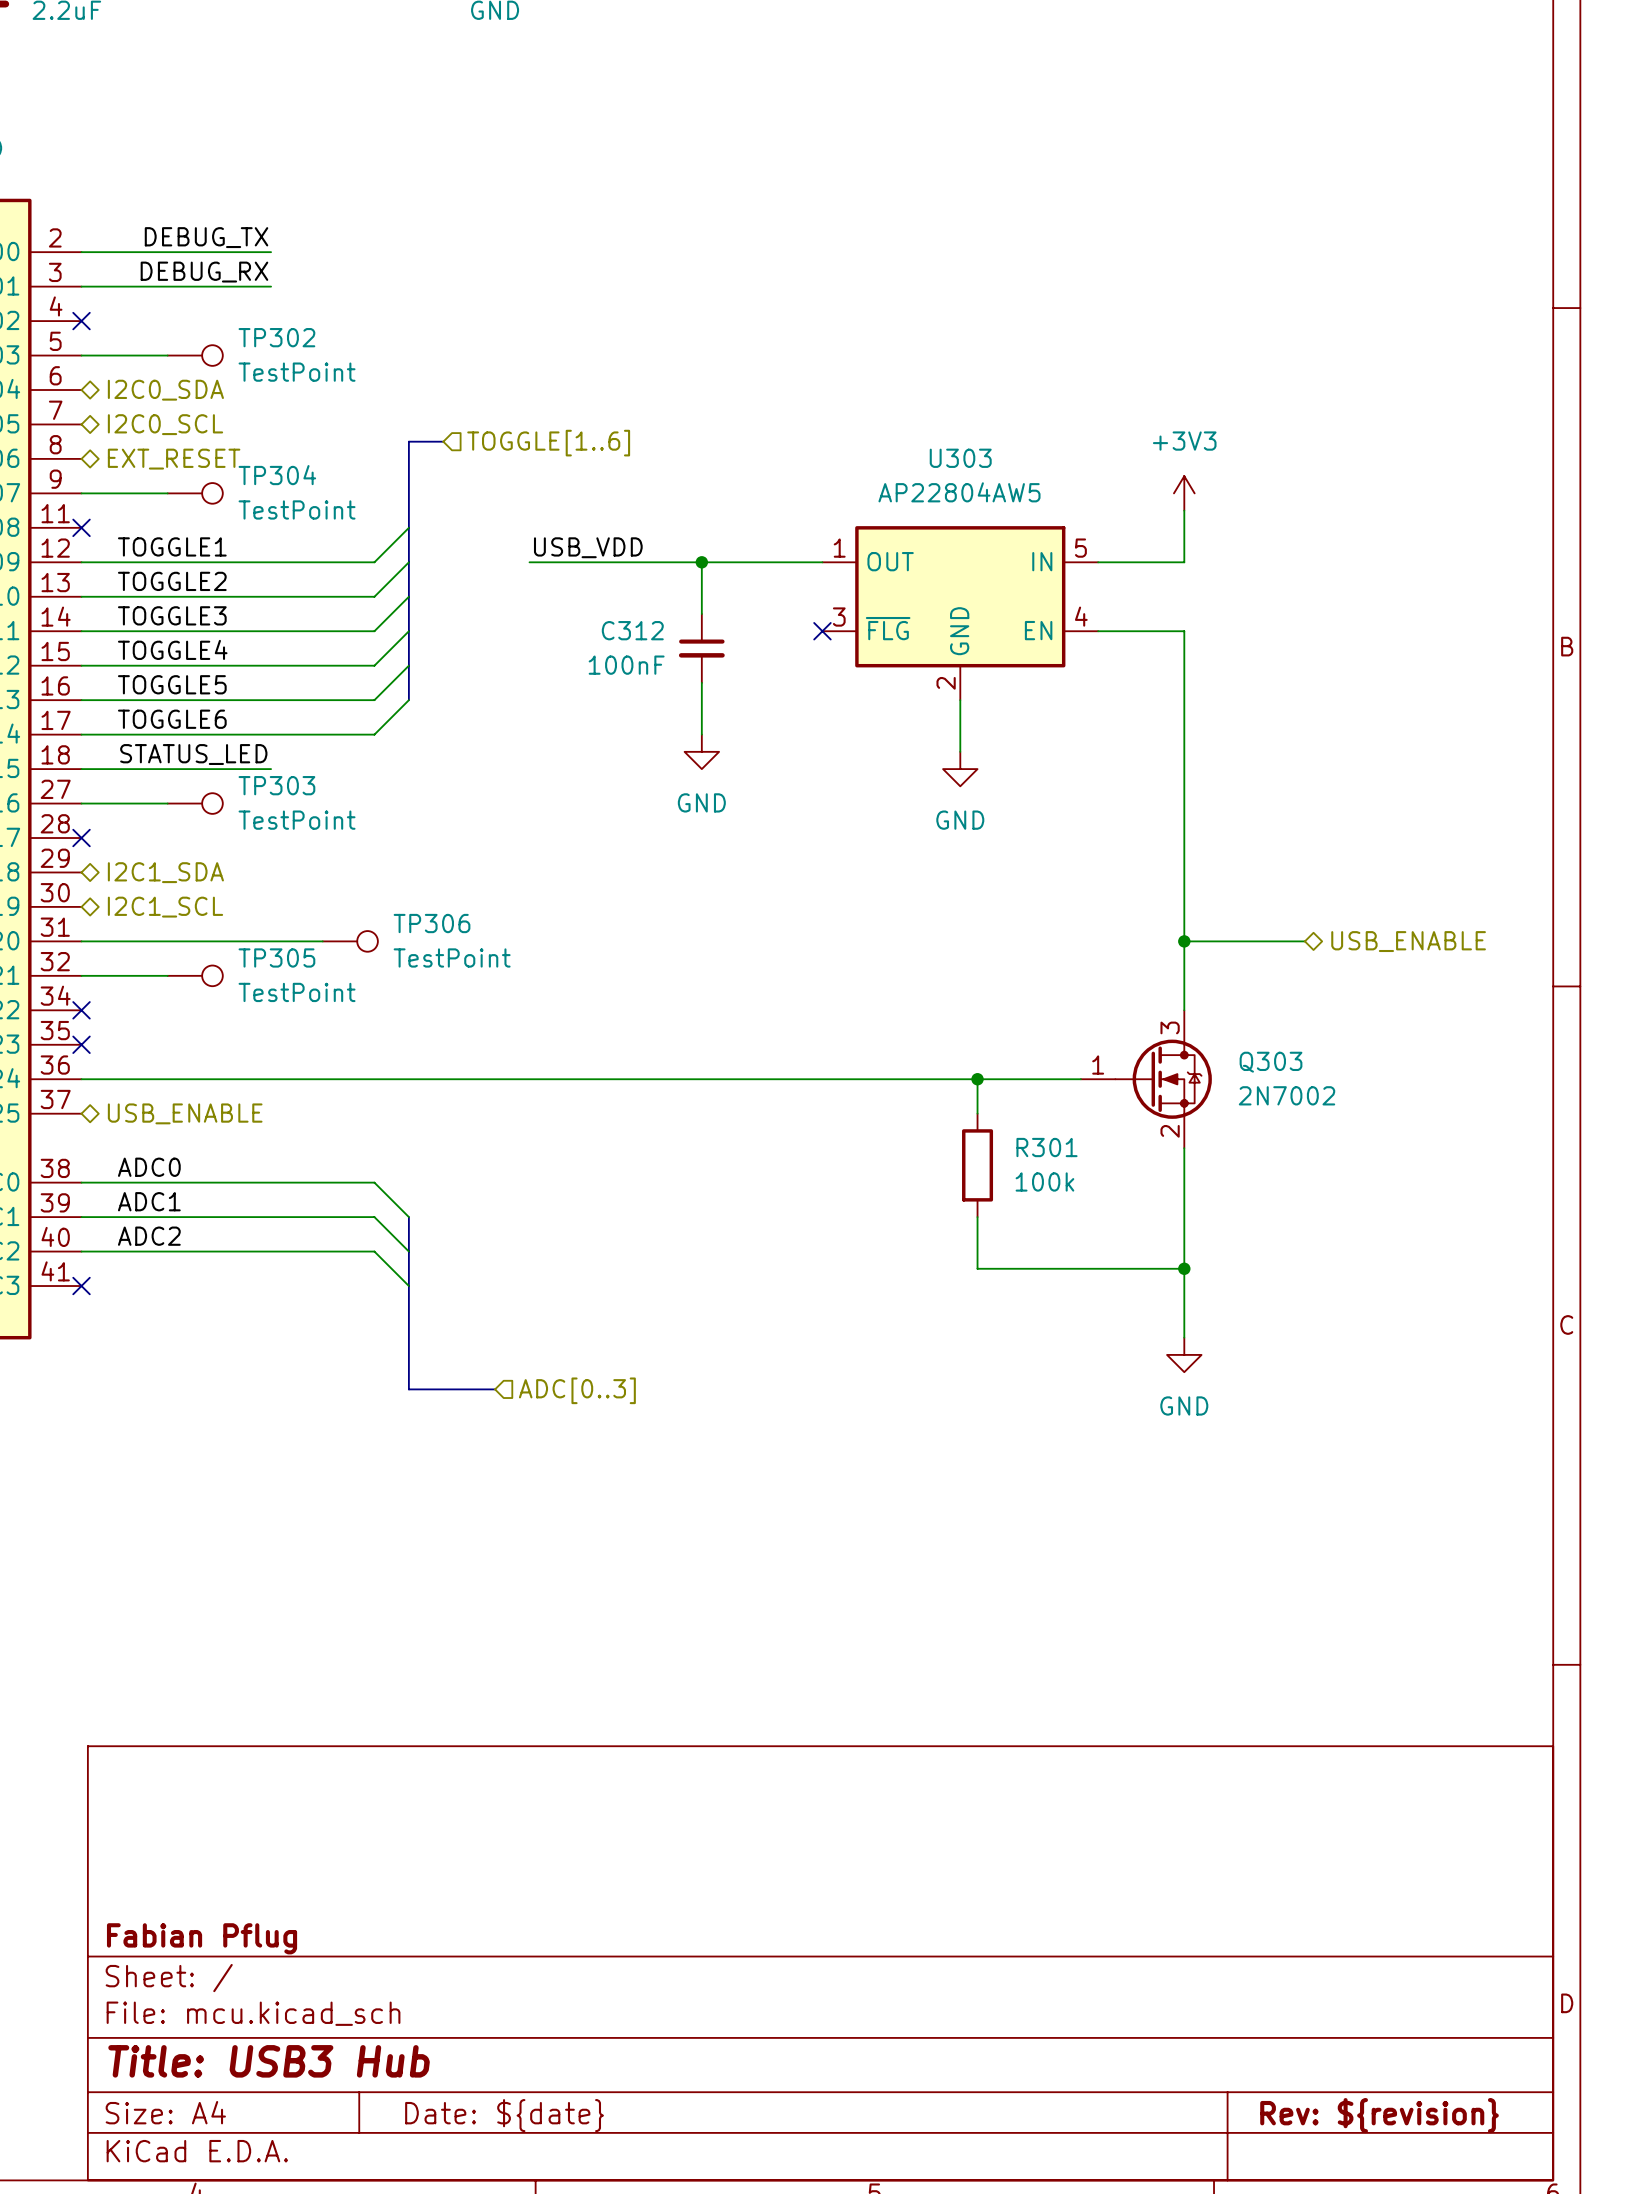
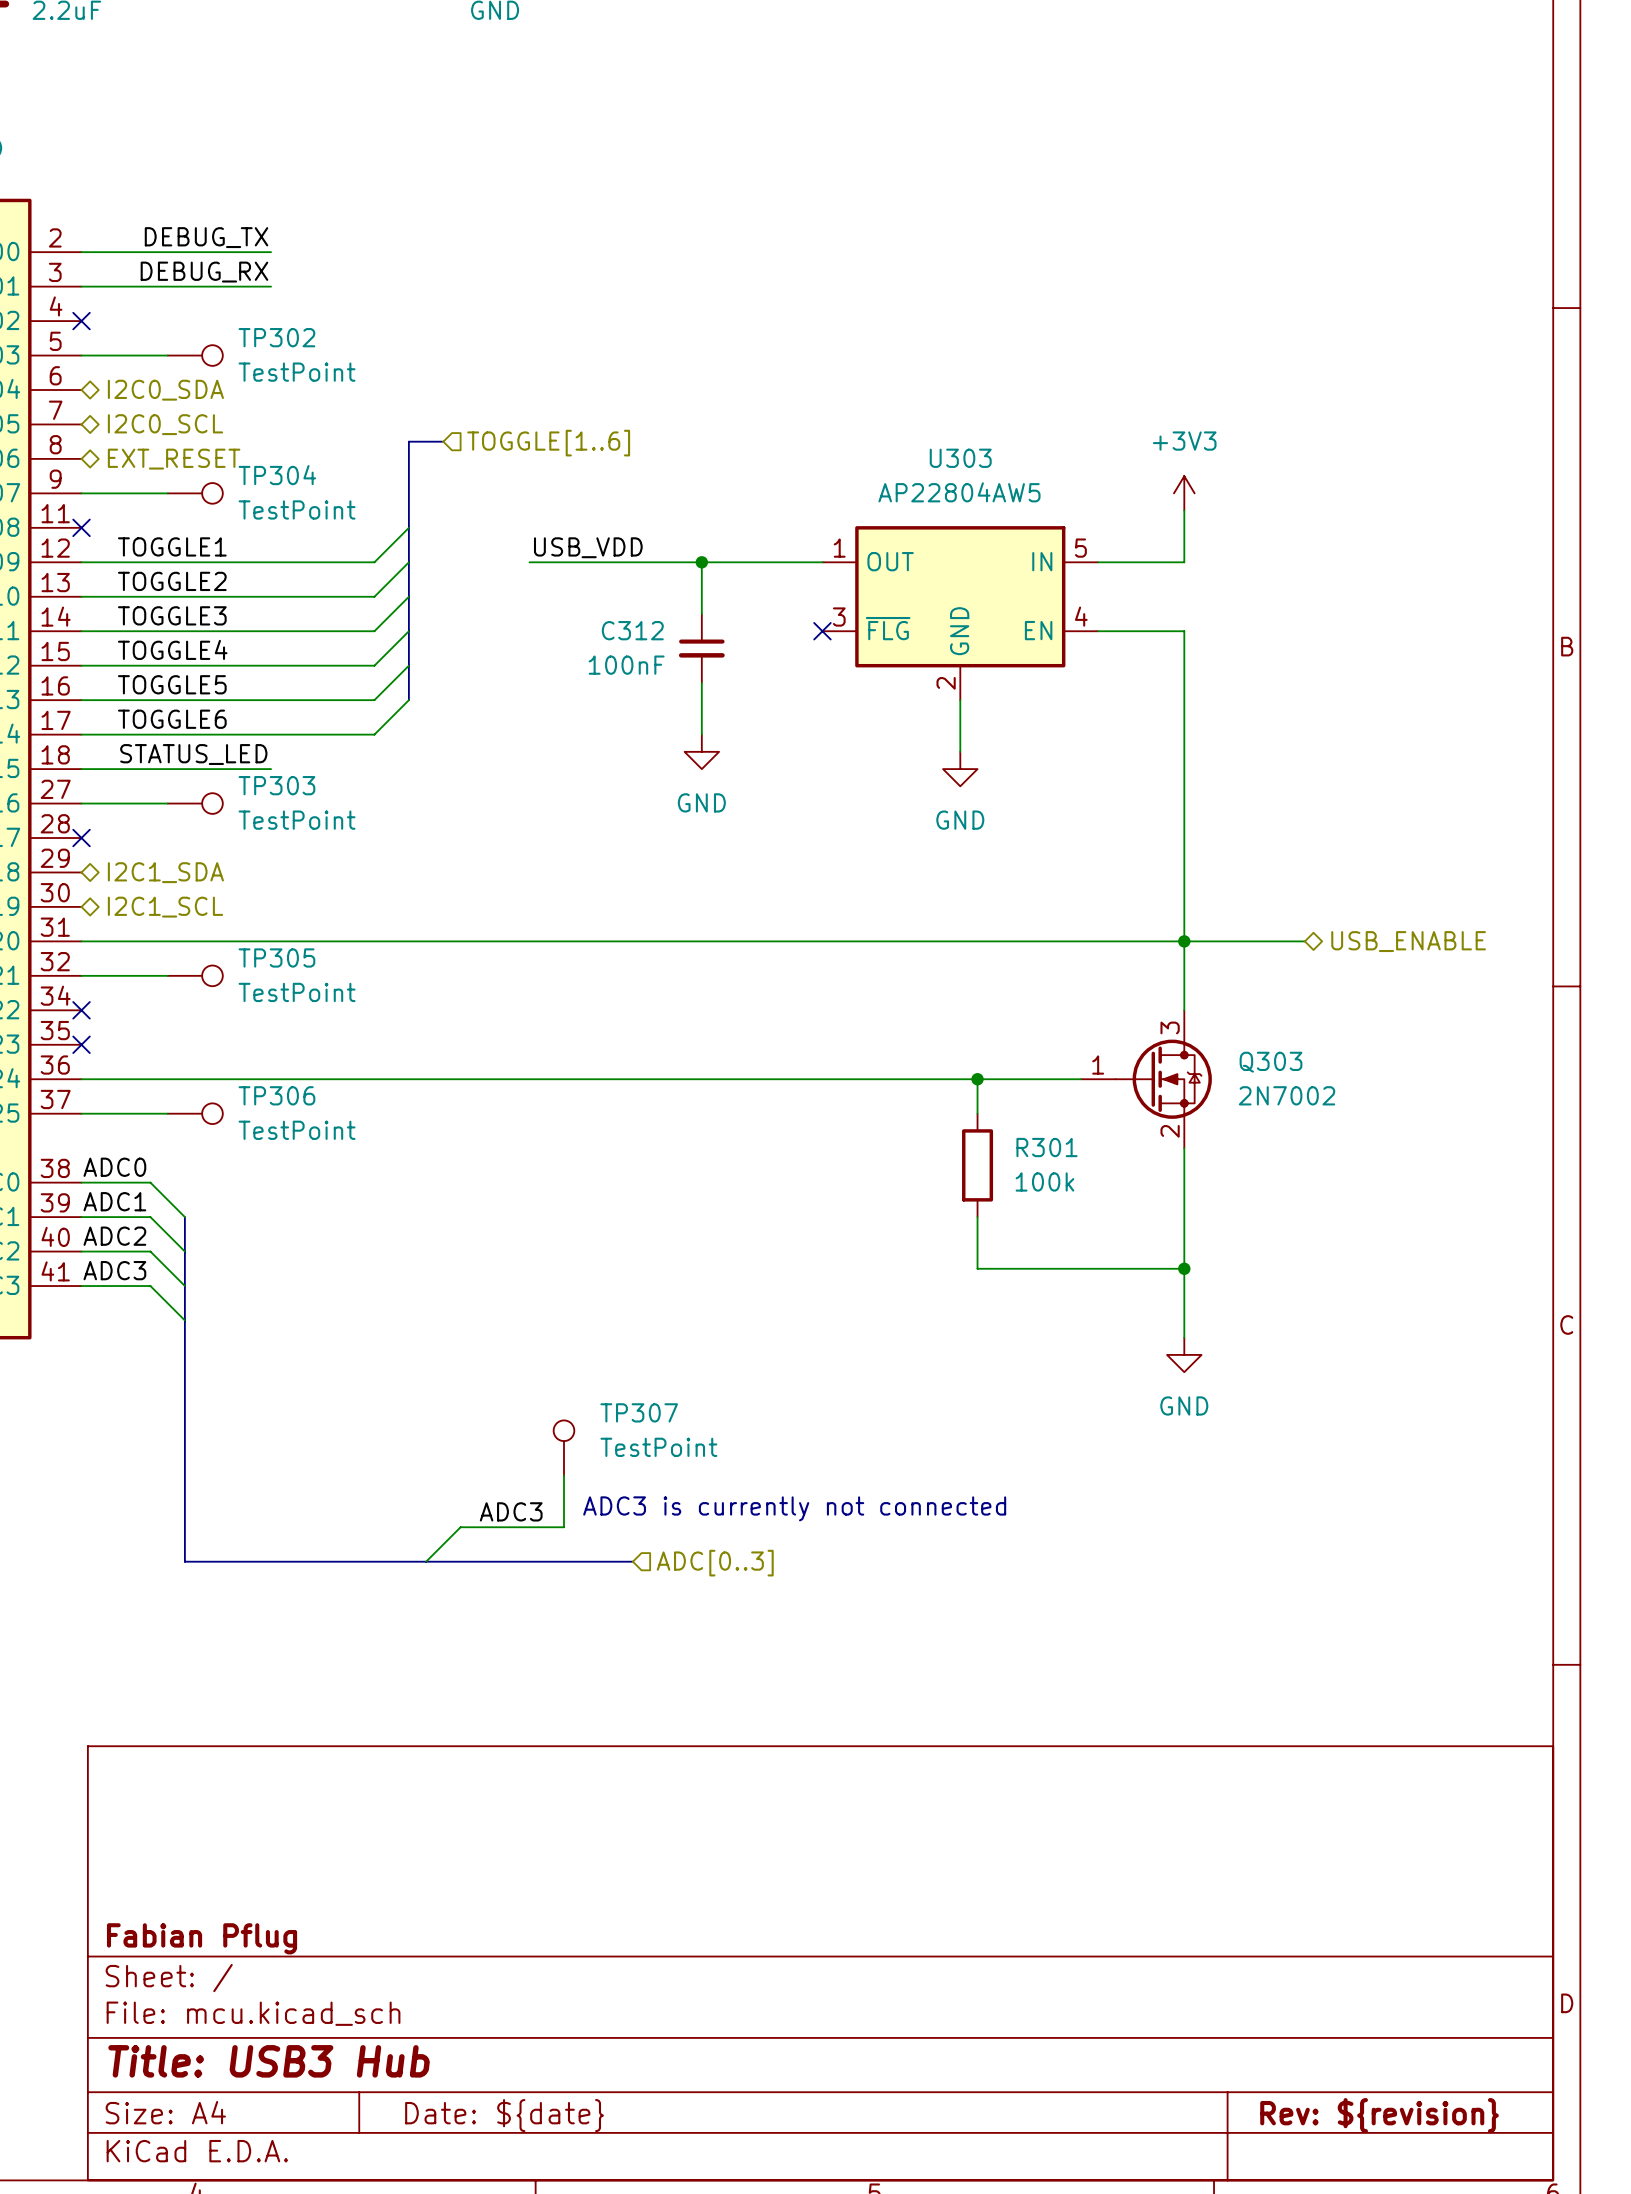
wire: none -> (322, 941) (1184, 941)
TP306 position: (350, 941) -> (195, 1113)
wire: none -> (81, 1113) (167, 1113)
hierarchical label: USB_ENABLE (185, 1113) -> none
label position: ADC0 (149, 1167) -> ADC0 (114, 1167)
wire: (150, 1182) (374, 1182) (408, 1217) -> (150, 1182) (184, 1217)
label position: ADC1 (149, 1201) -> ADC1 (114, 1201)
wire: (150, 1217) (374, 1217) (408, 1251) -> (150, 1217) (184, 1251)
bus: none -> (184, 1217) (184, 1561) (632, 1561)
bus: (408, 1217) (408, 1389) (495, 1389) -> none
label position: ADC2 (149, 1236) -> ADC2 (114, 1236)
wire: (150, 1251) (374, 1251) (408, 1286) -> (150, 1251) (184, 1286)
label: none -> ADC3 (114, 1270)
wire: none -> (81, 1286) (150, 1286) (184, 1320)
no-connect mark: (81, 1286) -> none
hierarchical label position: ADC[0..3] (577, 1390) -> ADC[0..3] (715, 1563)
TP307: none -> TestPoint (563, 1447)
wire: none -> (563, 1475) (563, 1527) (460, 1527) (426, 1561)
text: none -> ADC3 is currently not connected (794, 1508)
label: none -> ADC3 (511, 1511)

